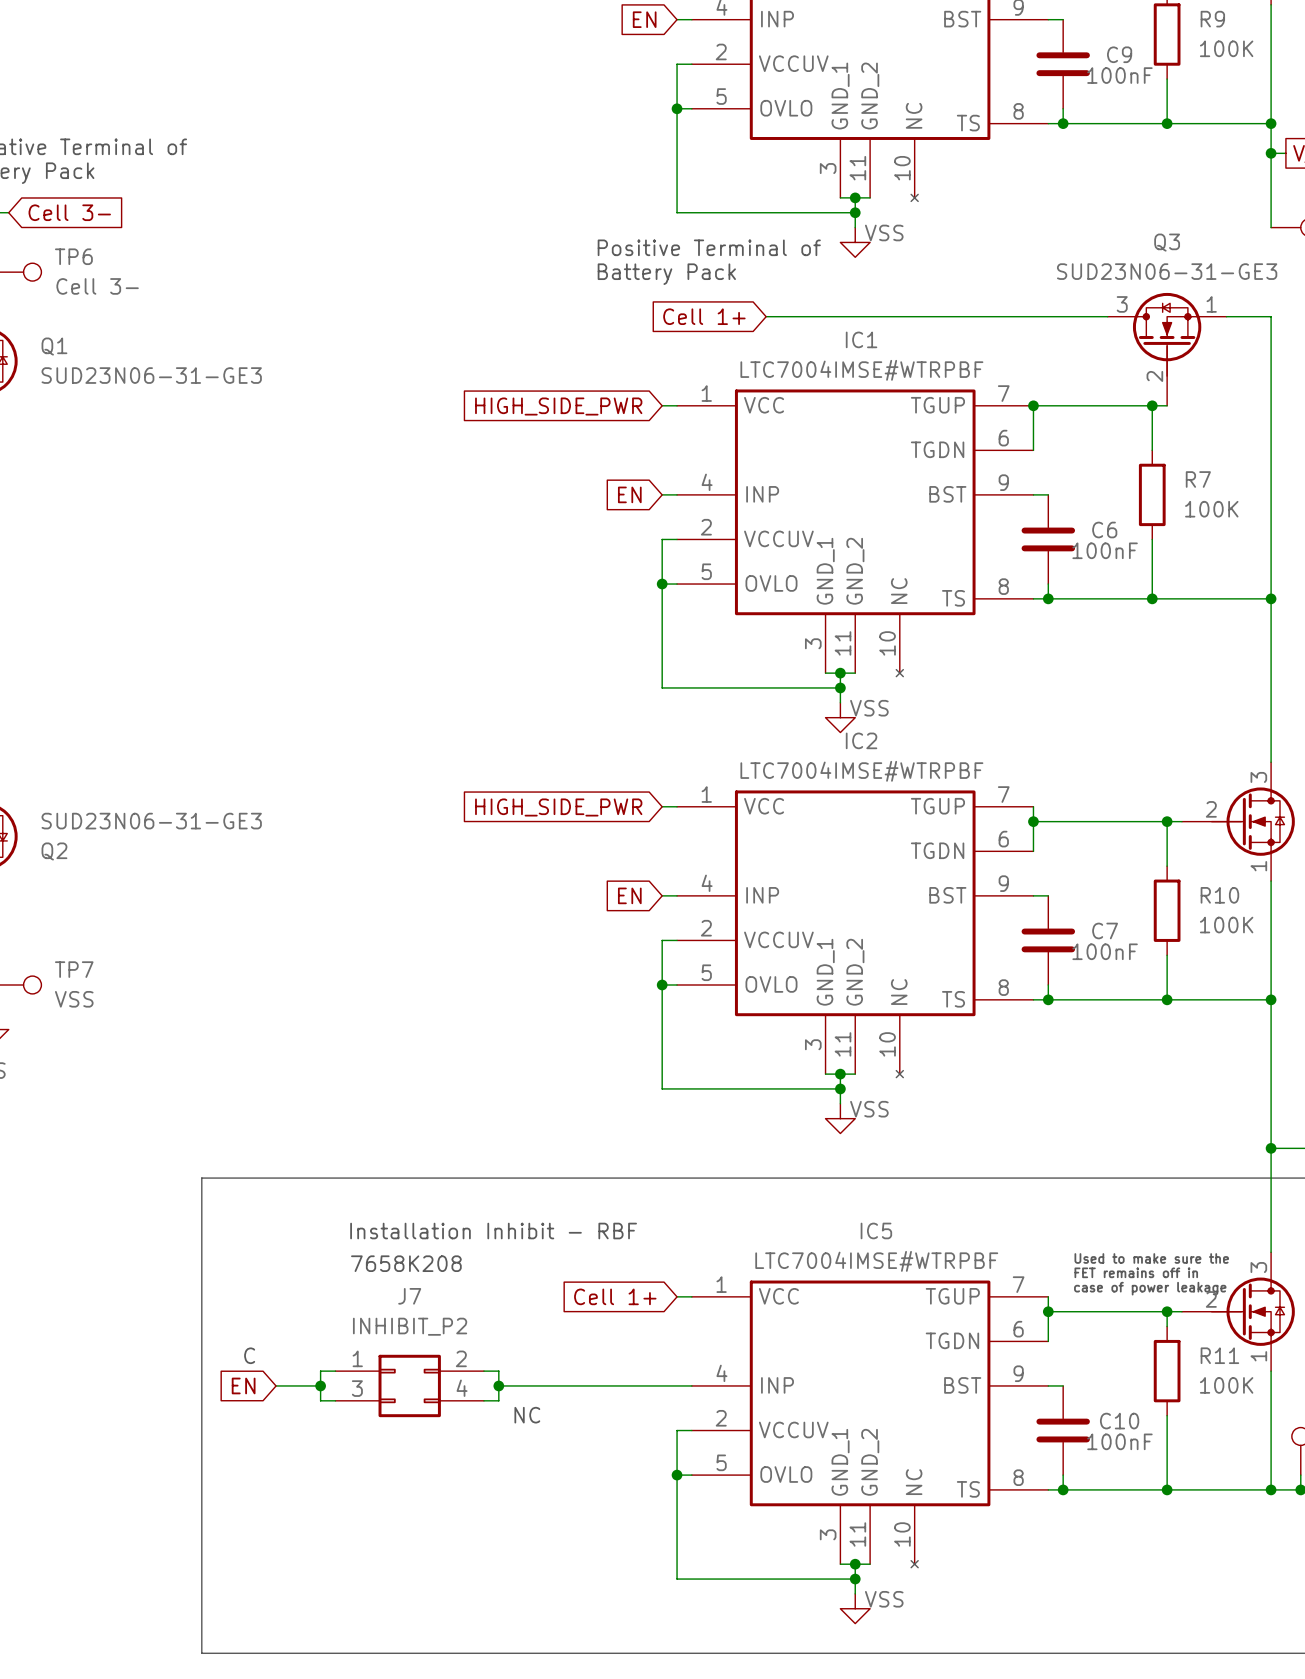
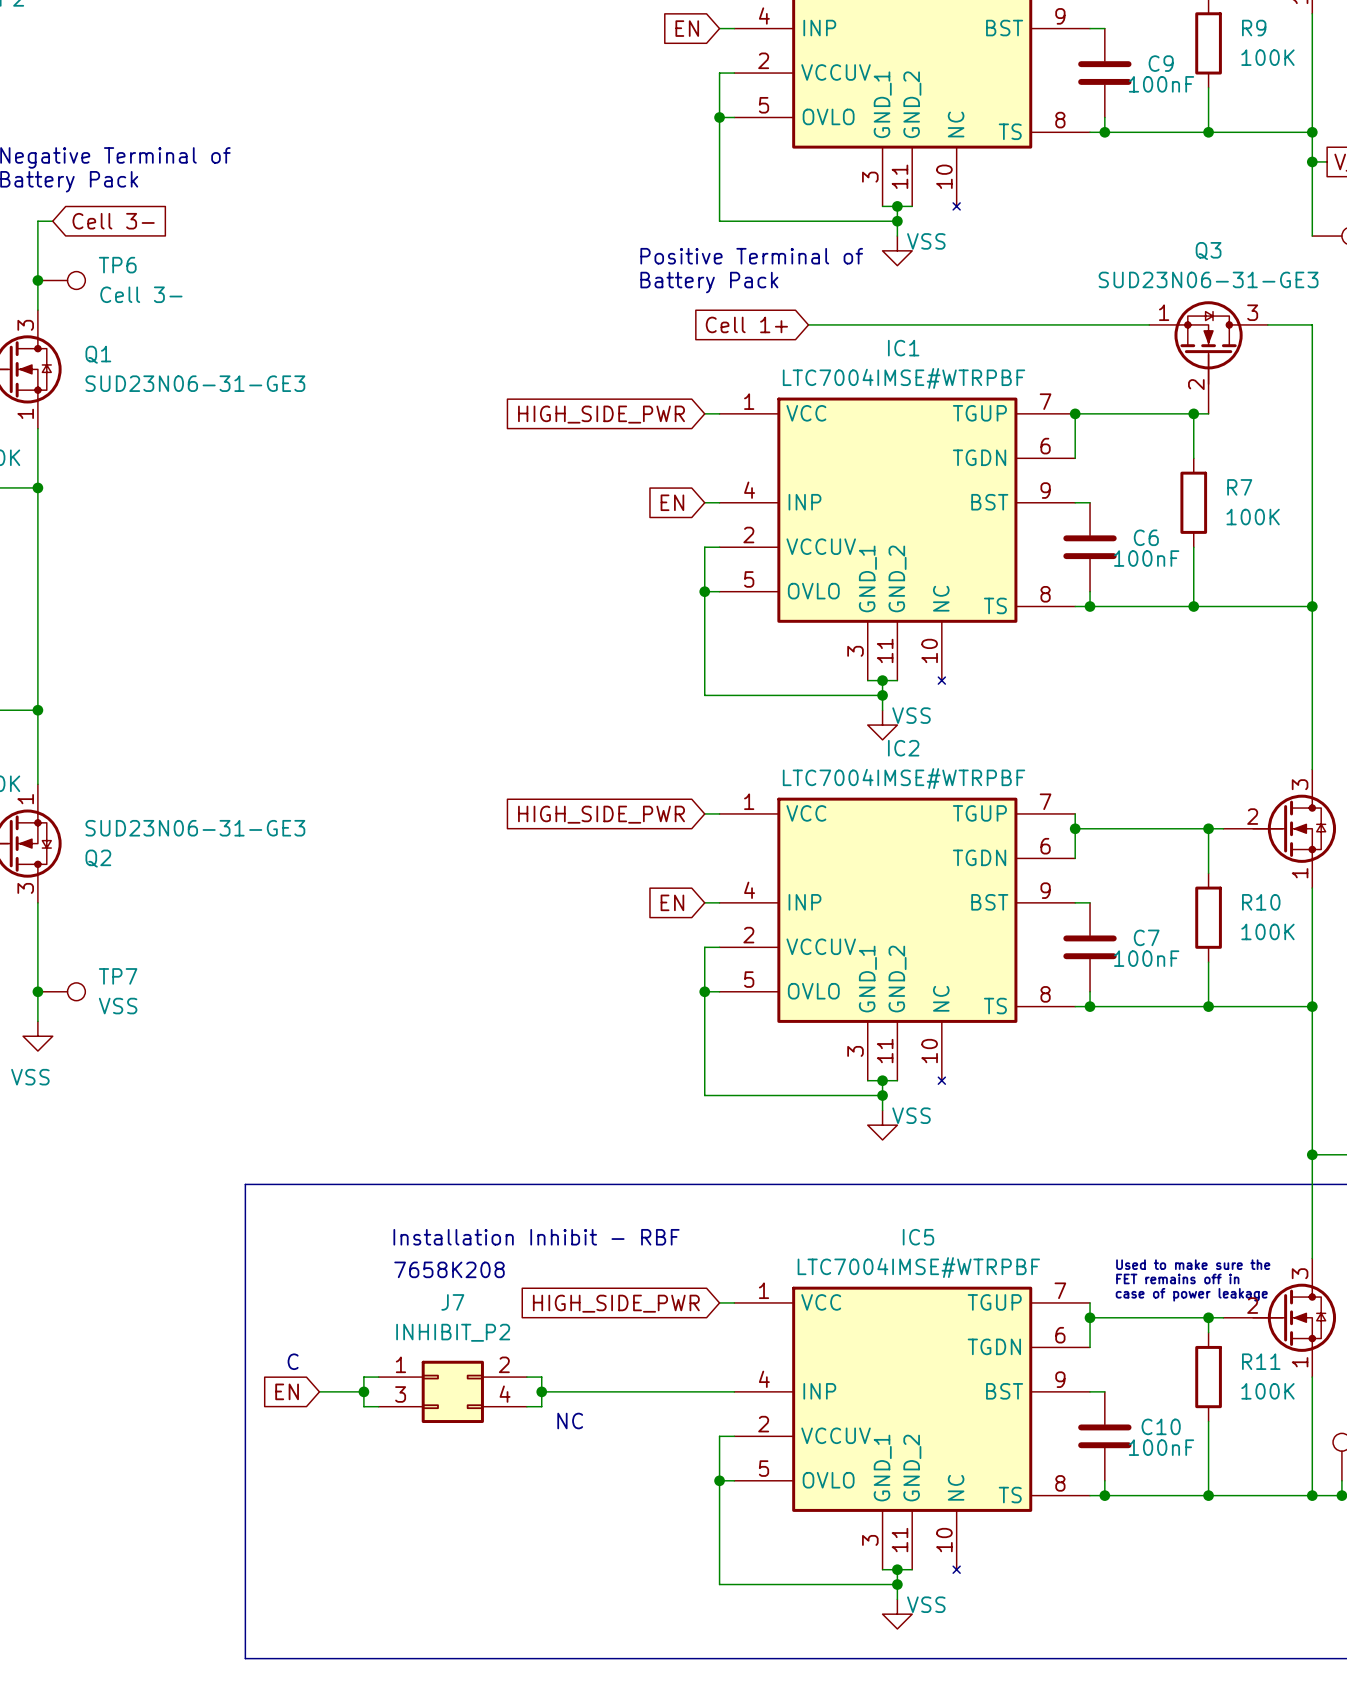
Q3 flip: as is (1167, 334) -> left-right (1208, 342)
global label: Cell 1+ (615, 1296) -> HIGH_SIDE_PWR (616, 1303)

